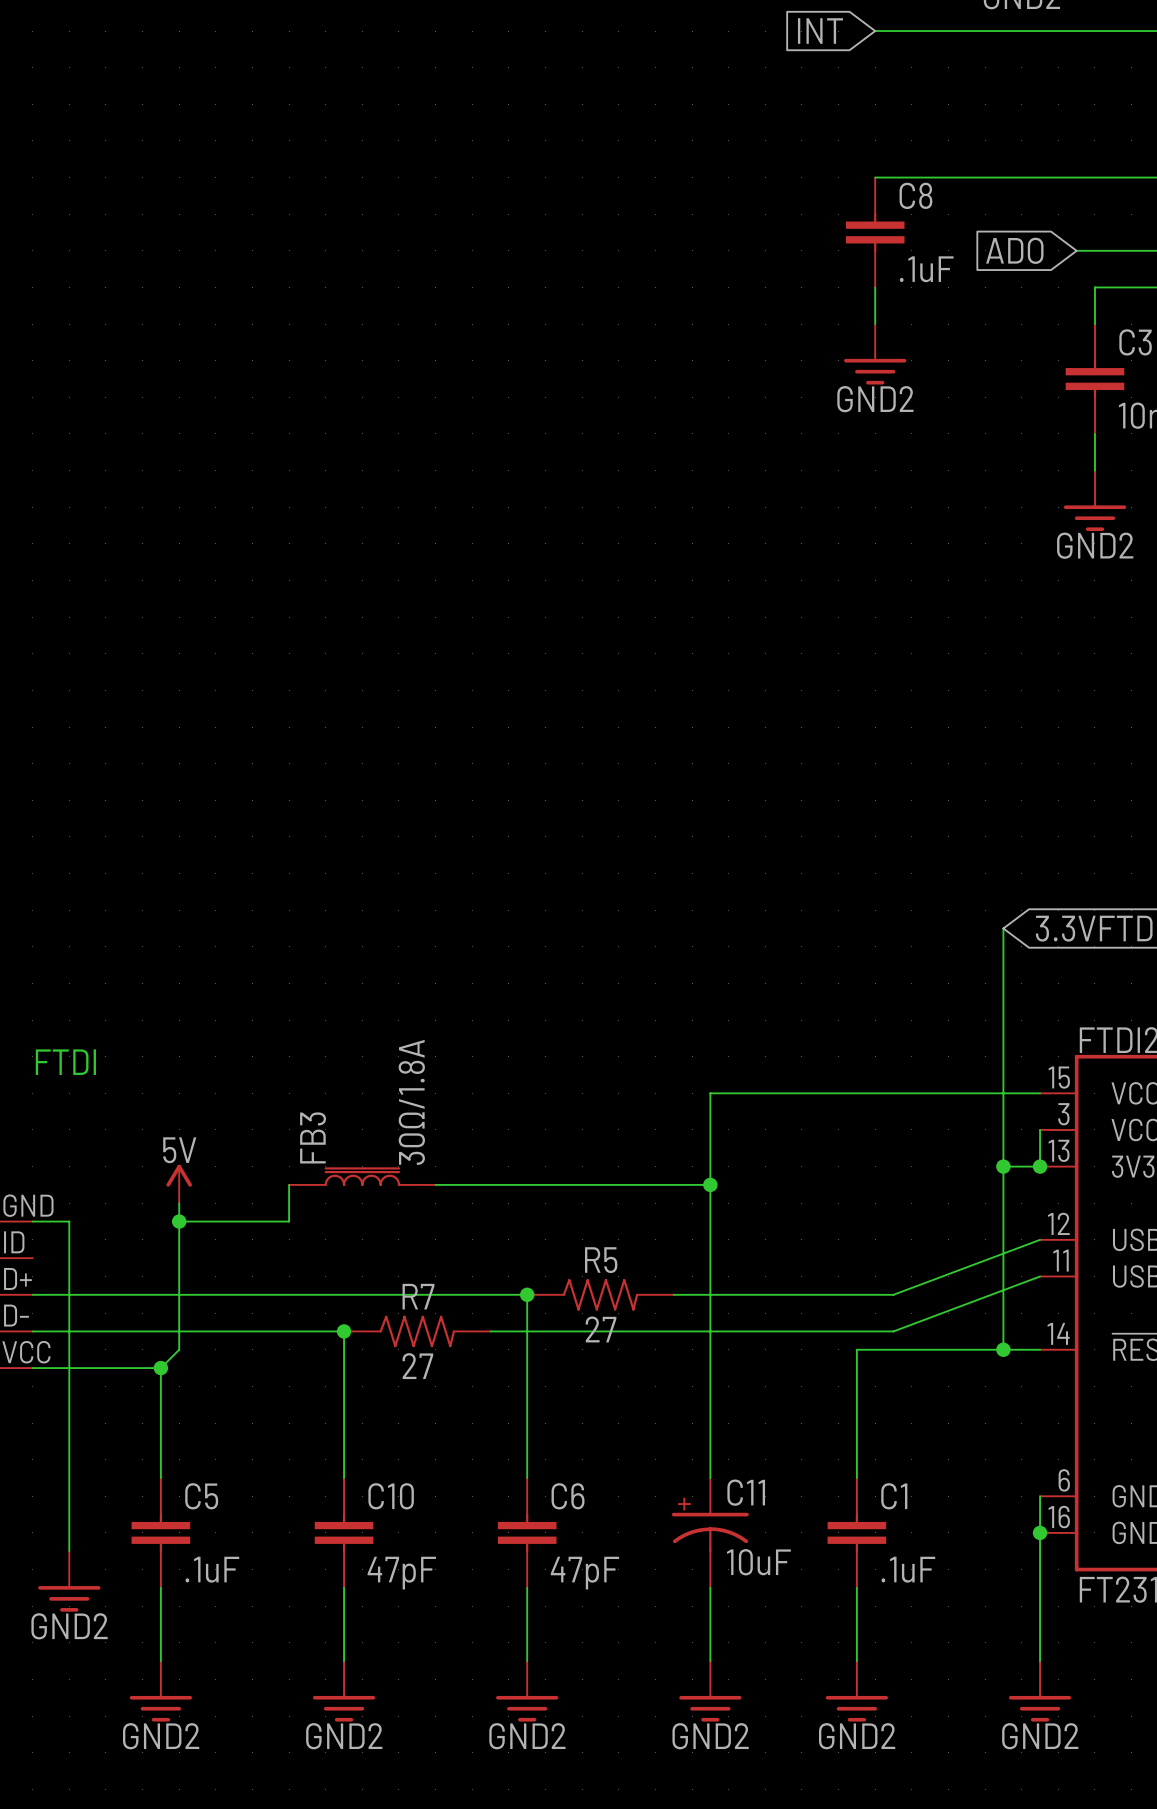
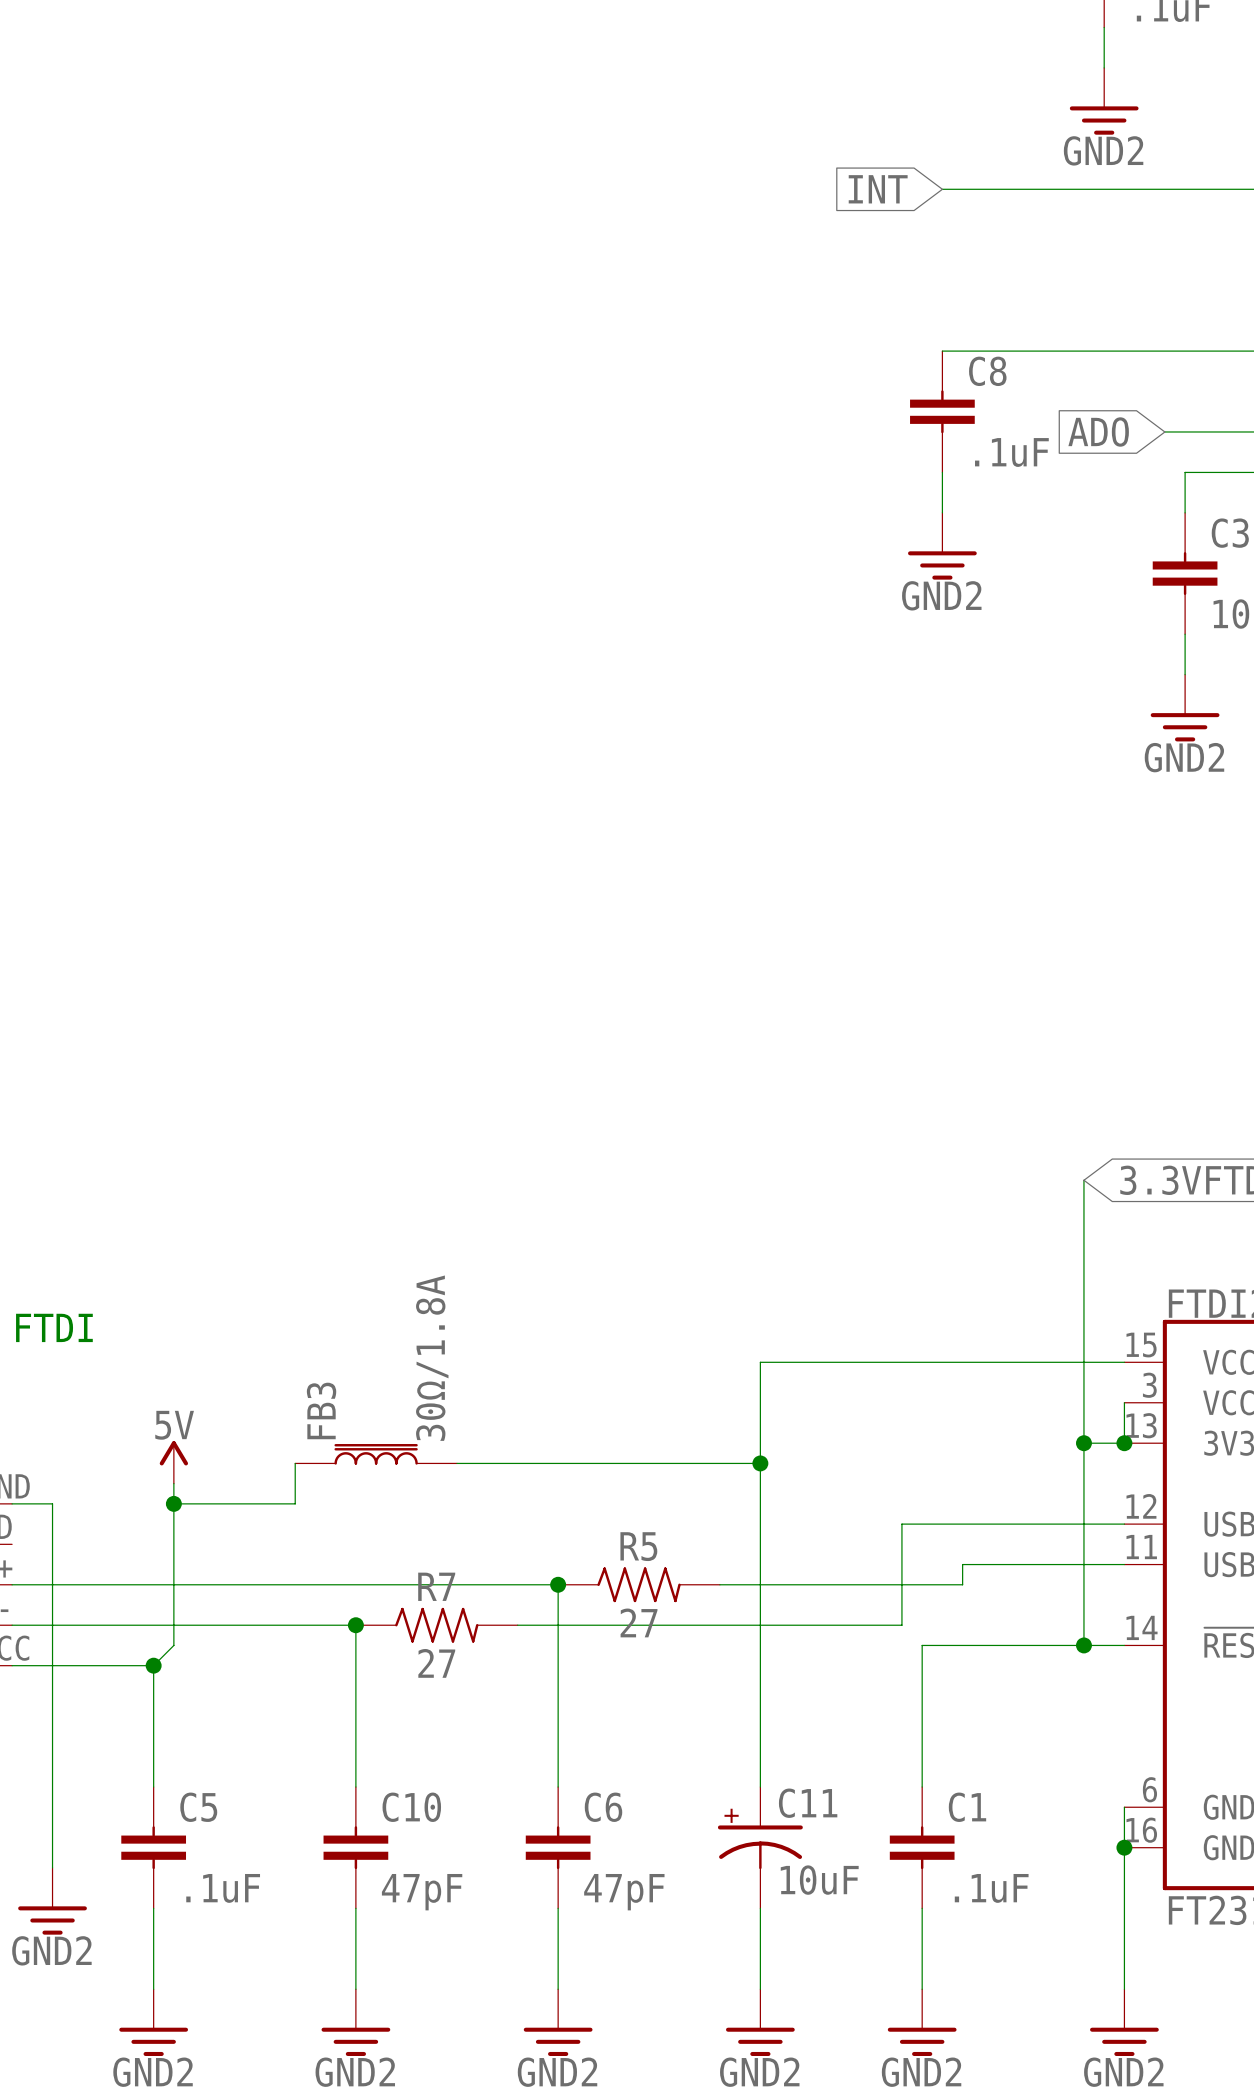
wire: (1040, 1239) (893, 1294) -> (1124, 1564) (962, 1564) (962, 1584)
wire: (1040, 1276) (893, 1331) (838, 1331) -> (1124, 1524) (901, 1524) (901, 1625)

